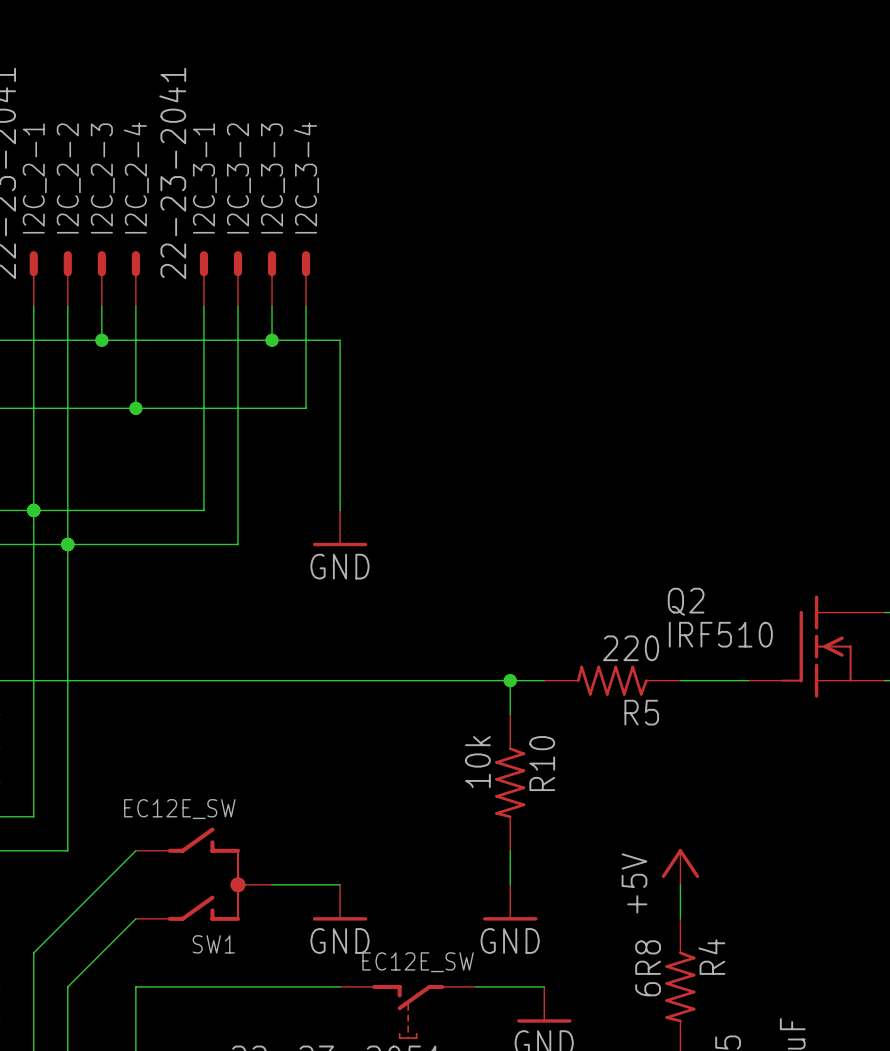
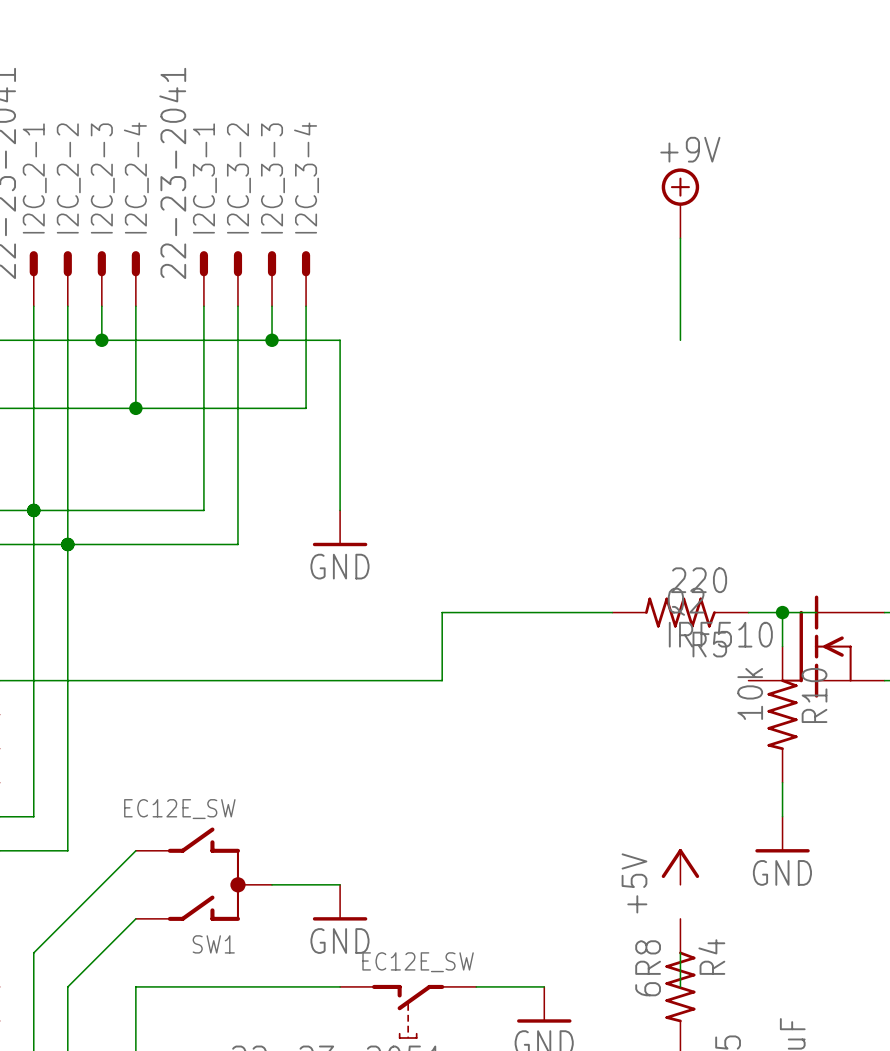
power symbol: none -> +9V (680, 203)
wire: none -> (680, 238) (680, 340)
junction: none -> (782, 612)
wire: (442, 680) (544, 680) -> (442, 680) (442, 612) (612, 612)
wire: (510, 680) (510, 714) -> (782, 612) (782, 646)
junction: (510, 680) -> none
R5 position: (612, 680) -> (680, 612)
wire: (680, 680) (748, 680) -> (748, 612) (816, 612)
R10 position: (510, 782) -> (782, 714)
power symbol: none -> GND (782, 834)
wire: (510, 850) (510, 884) -> (782, 782) (782, 816)
wire: (680, 884) (680, 918) -> (680, 952) (680, 986)
power symbol: GND (510, 902) -> none

